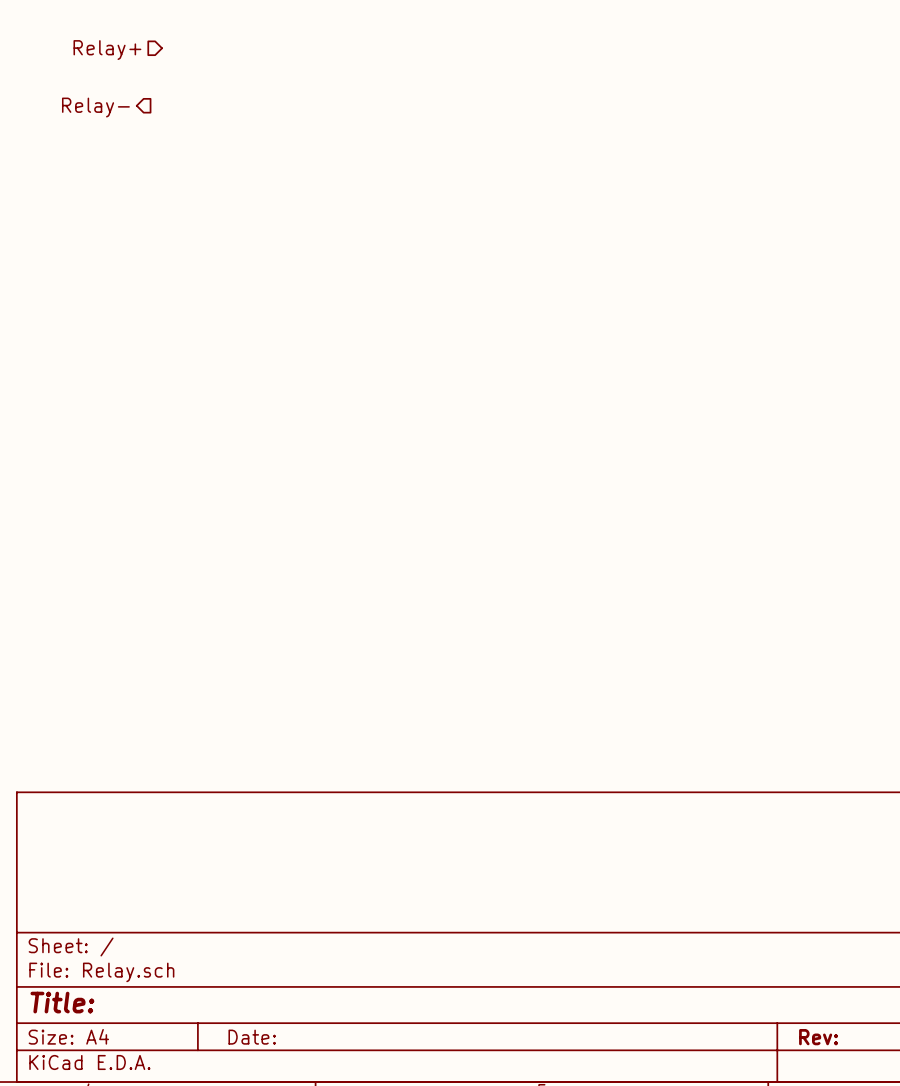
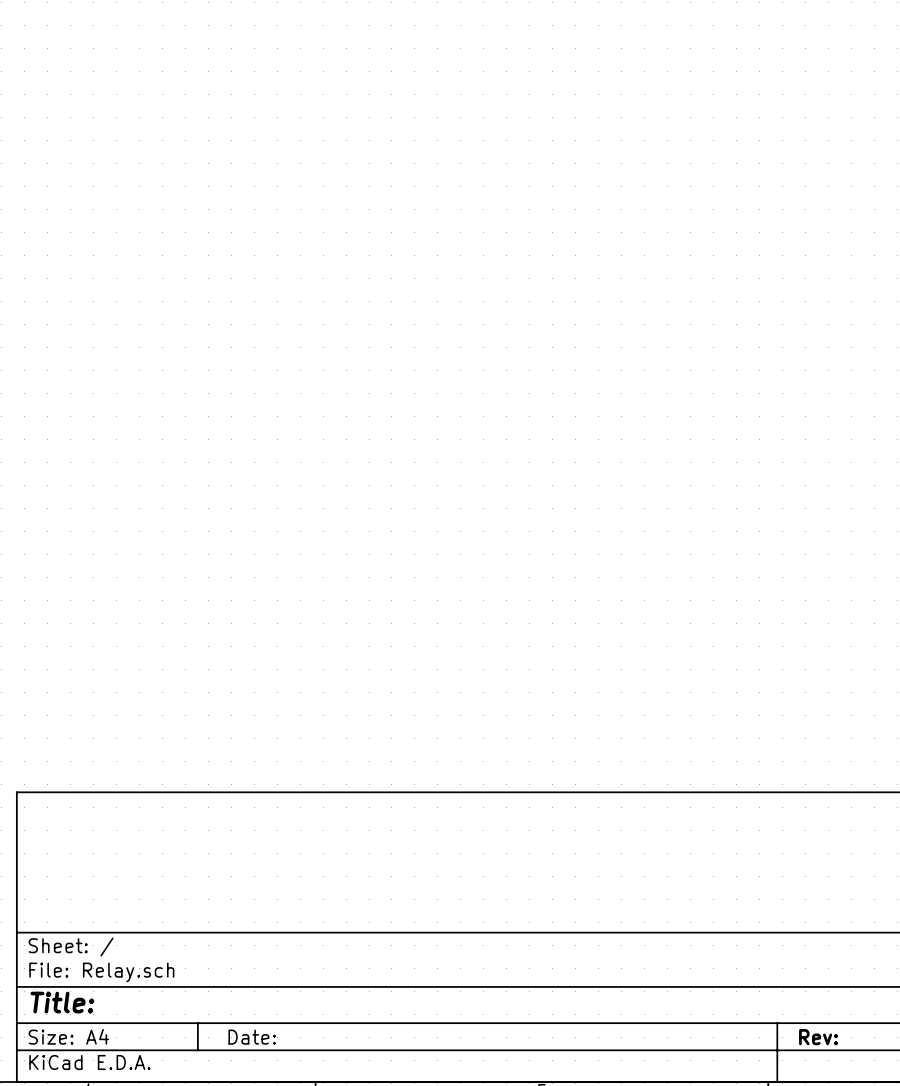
hierarchical label: Relay+ (107, 50) -> none
hierarchical label: Relay- (95, 107) -> none

